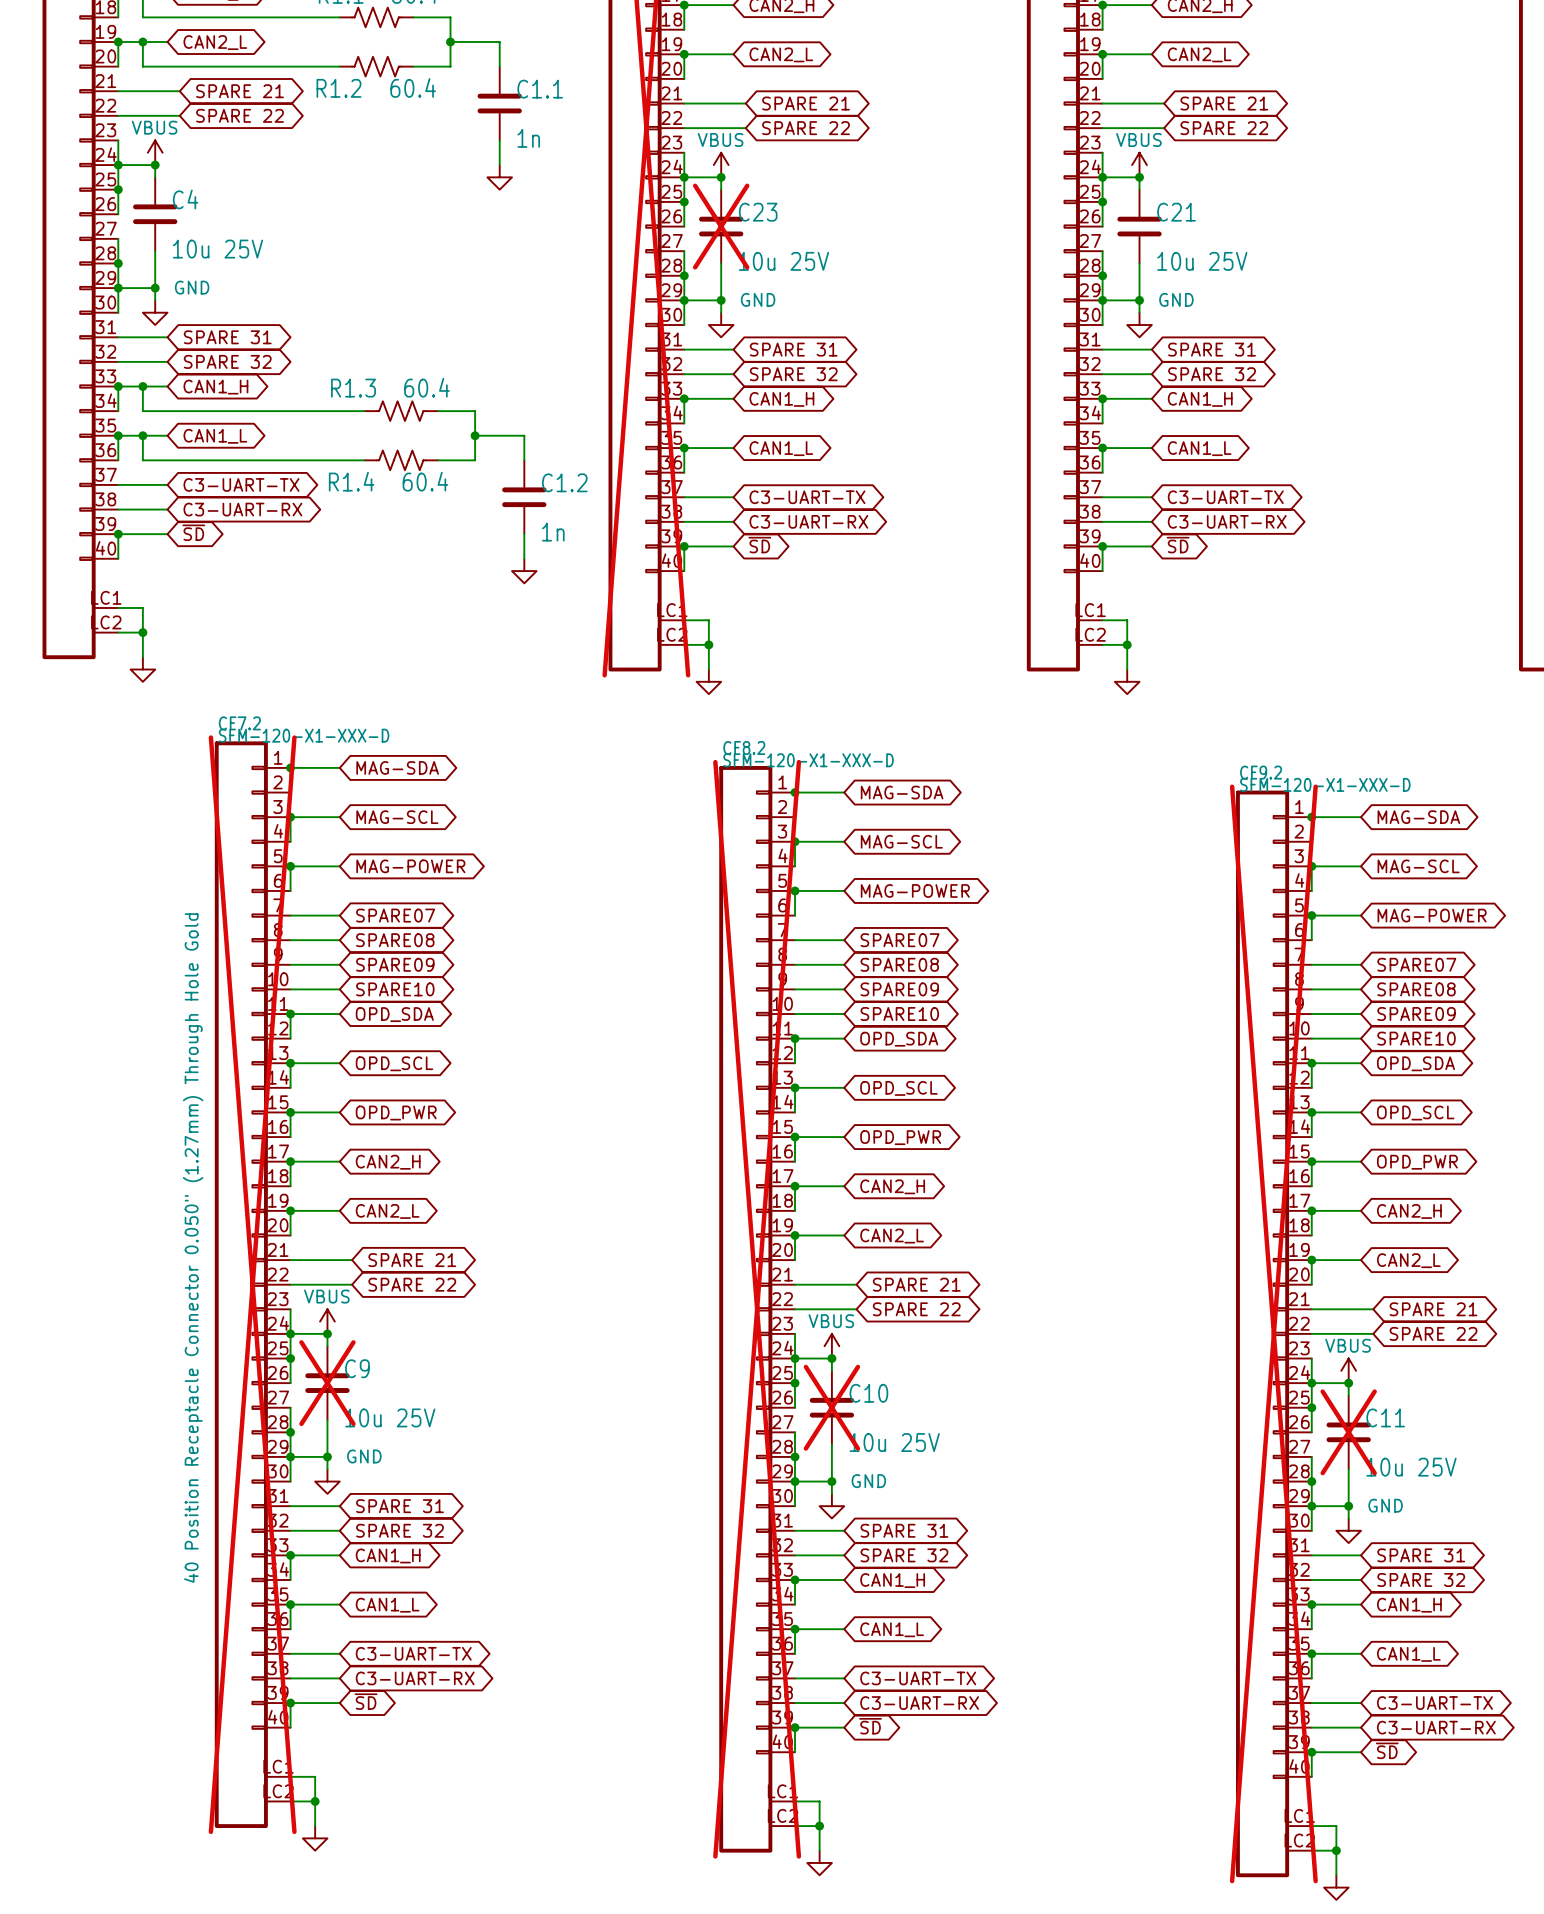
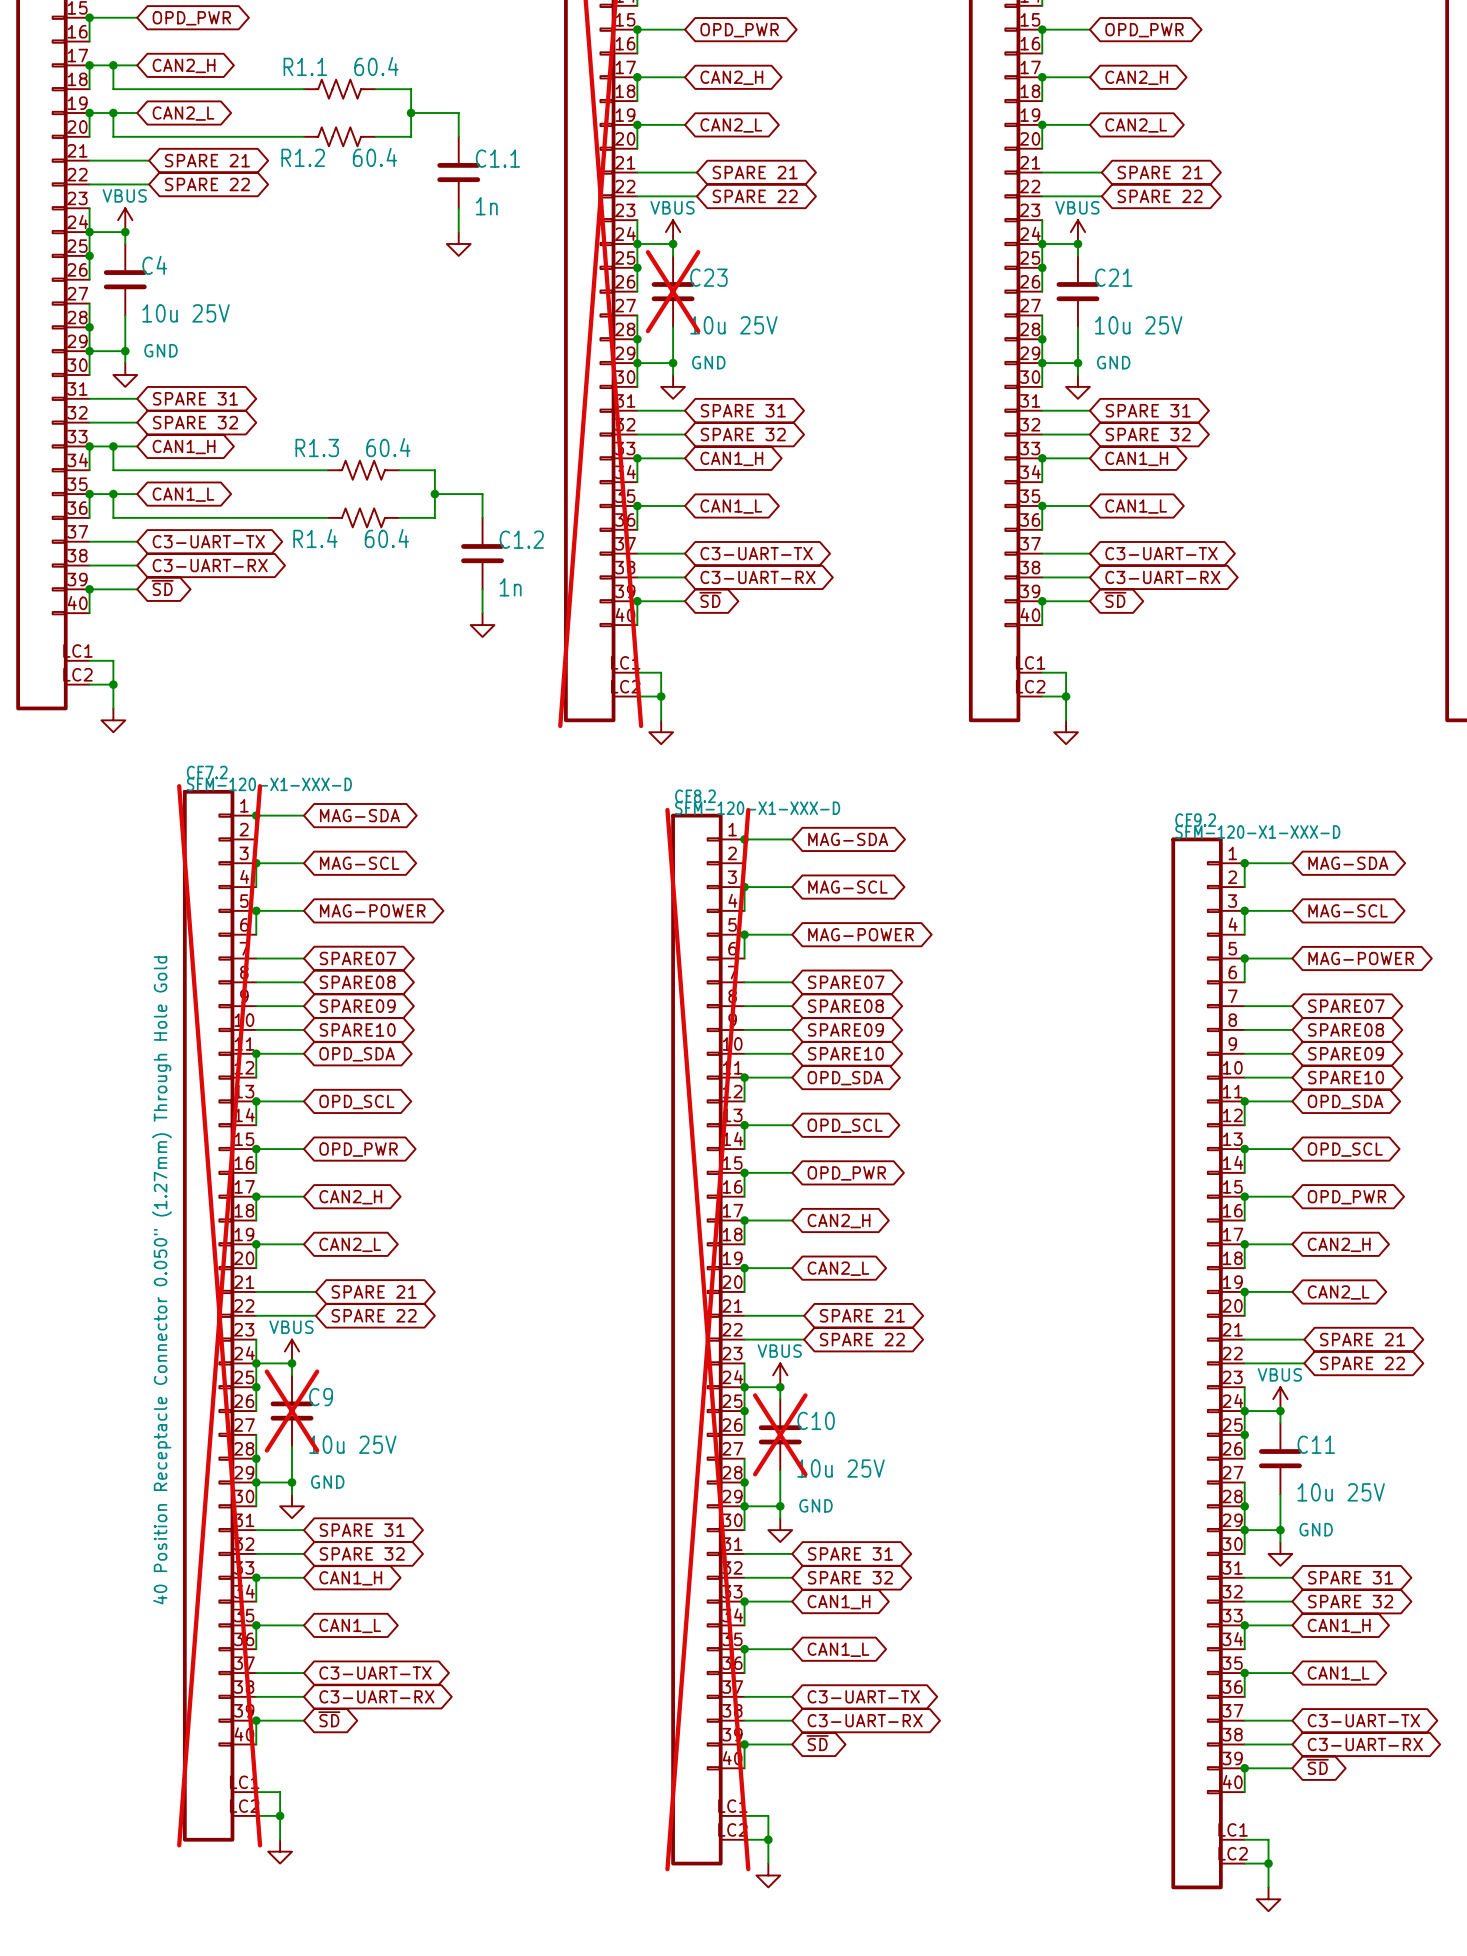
CF9.2 do-not-place cross: (1273, 1333) -> none
C11 do-not-place cross: (1348, 1432) -> none

